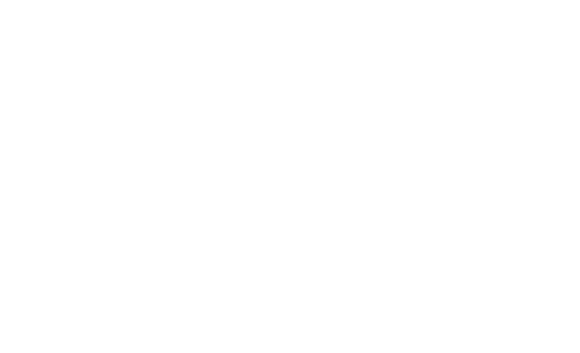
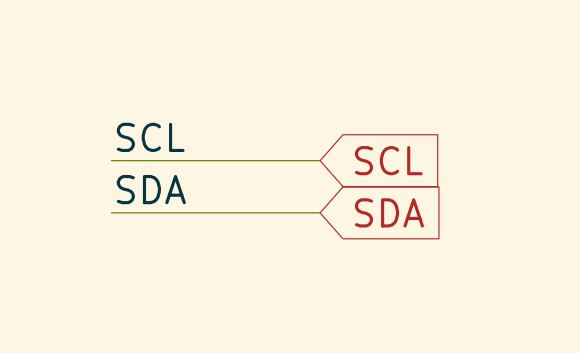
label: none -> SCL (150, 137)
wire: none -> (111, 160) (320, 160)
global label: none -> SCL (388, 160)
label: none -> SDA (151, 189)
wire: none -> (111, 212) (320, 212)
global label: none -> SDA (389, 212)

